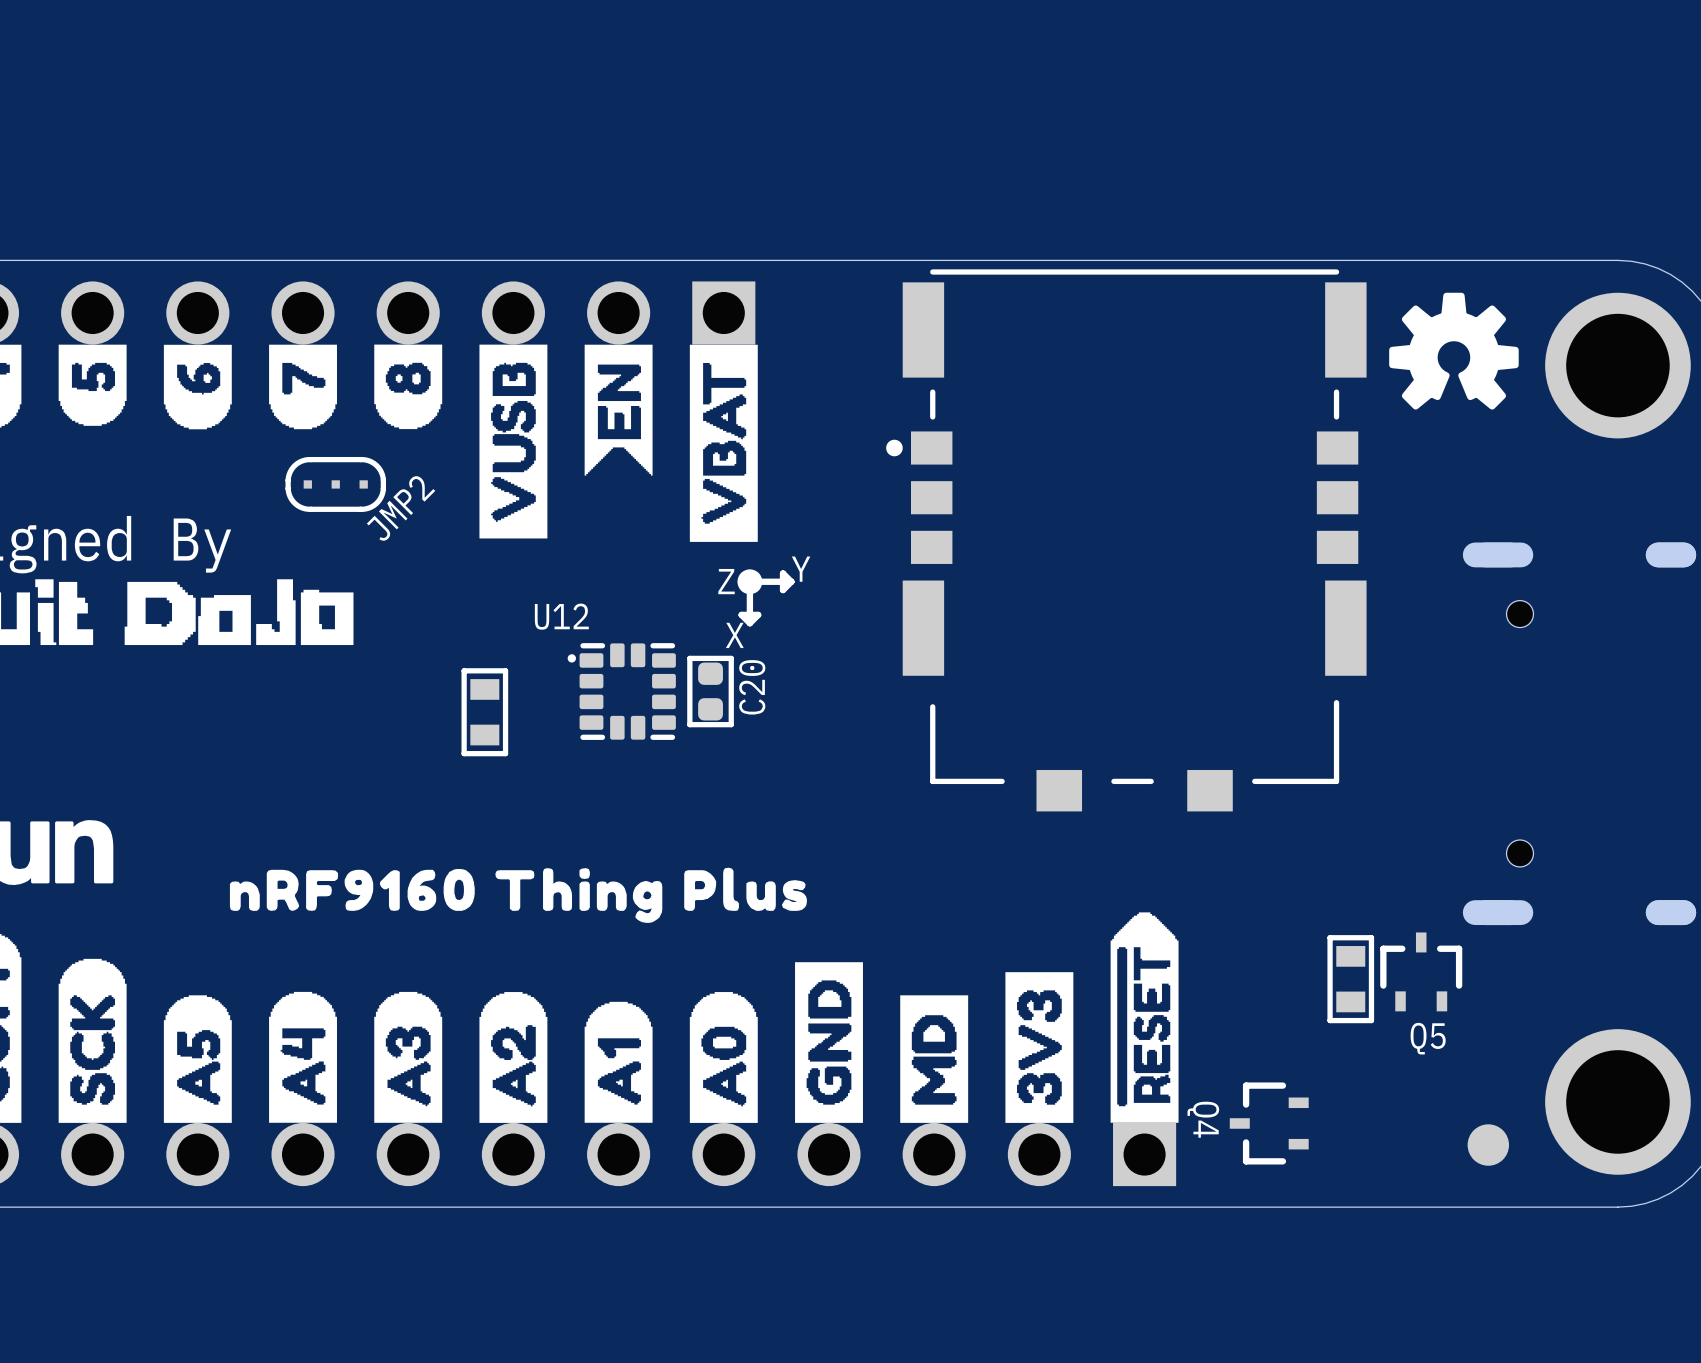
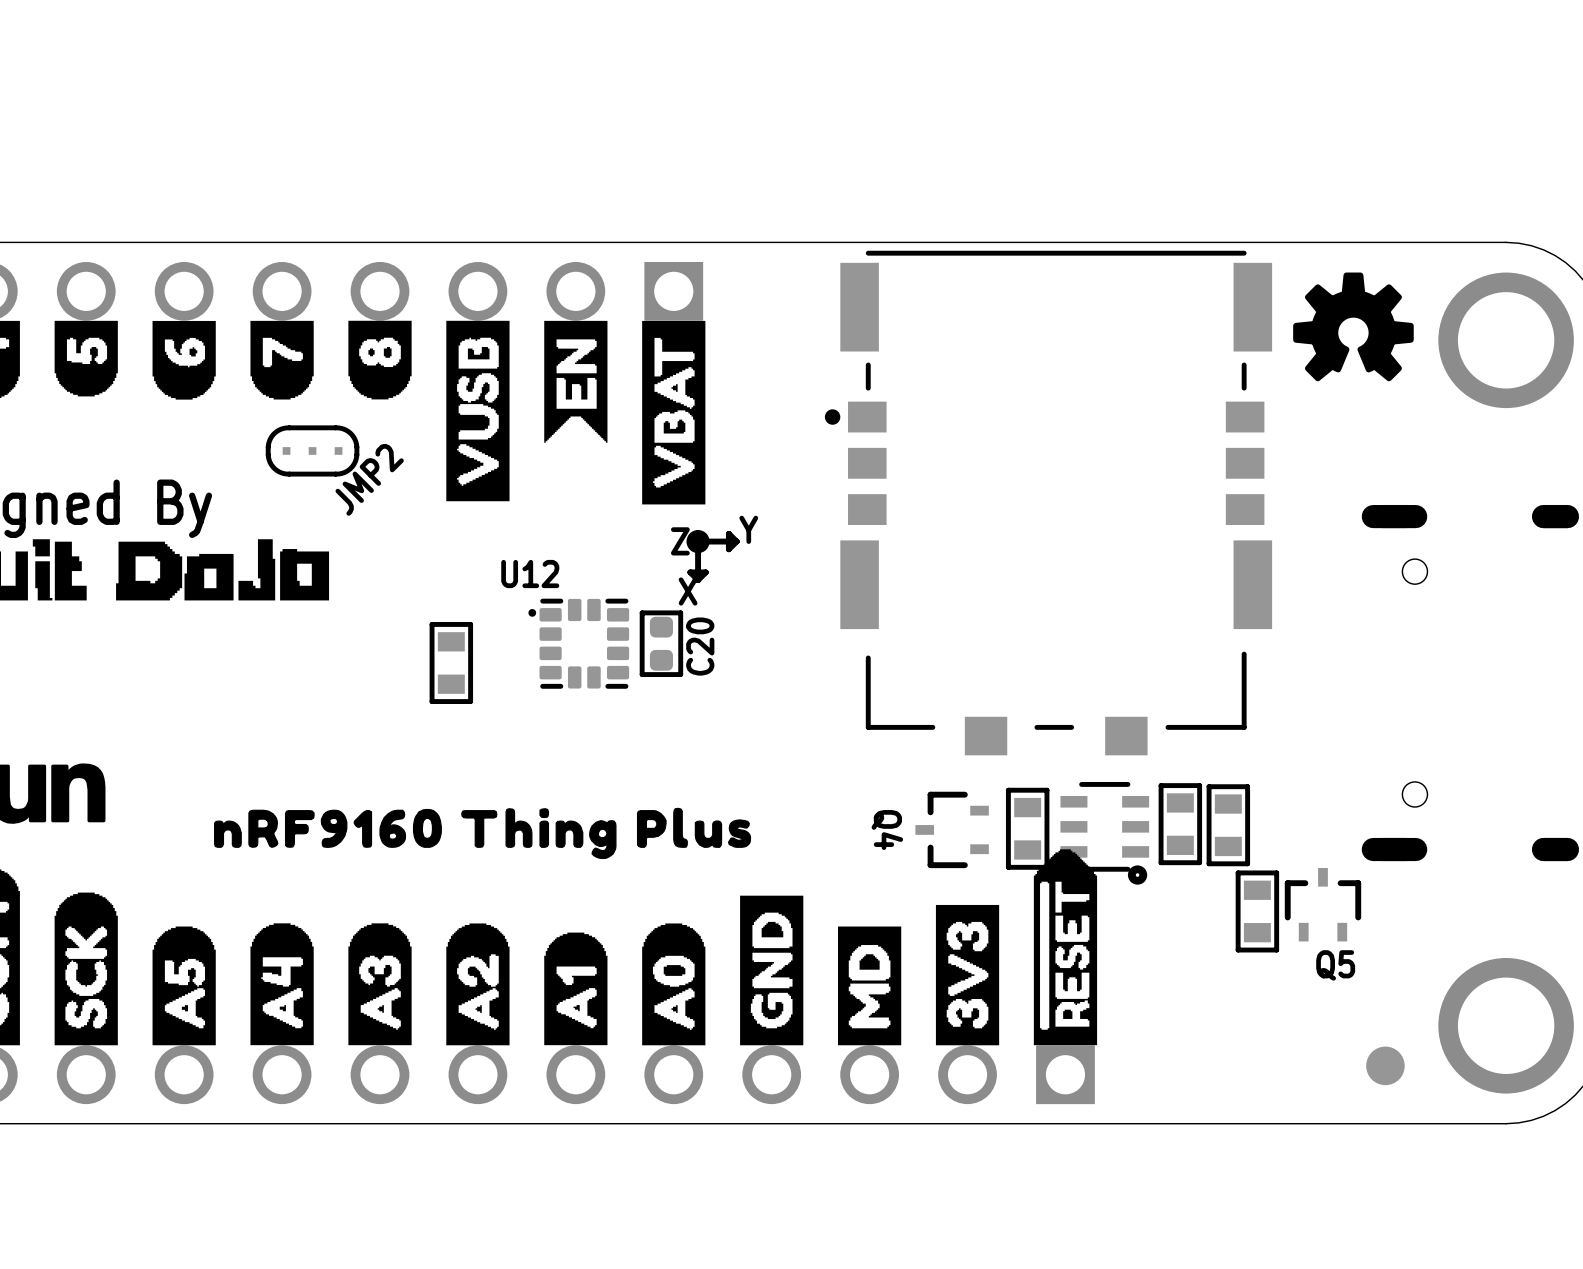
part: none -> (1180, 824)
part: none -> (1228, 825)
part: none -> (1027, 828)
part: none -> (1104, 833)
Q4 name position: Q4 (1203, 1119) -> Q4 (887, 830)
Q4 position: (1269, 1123) -> (952, 829)

